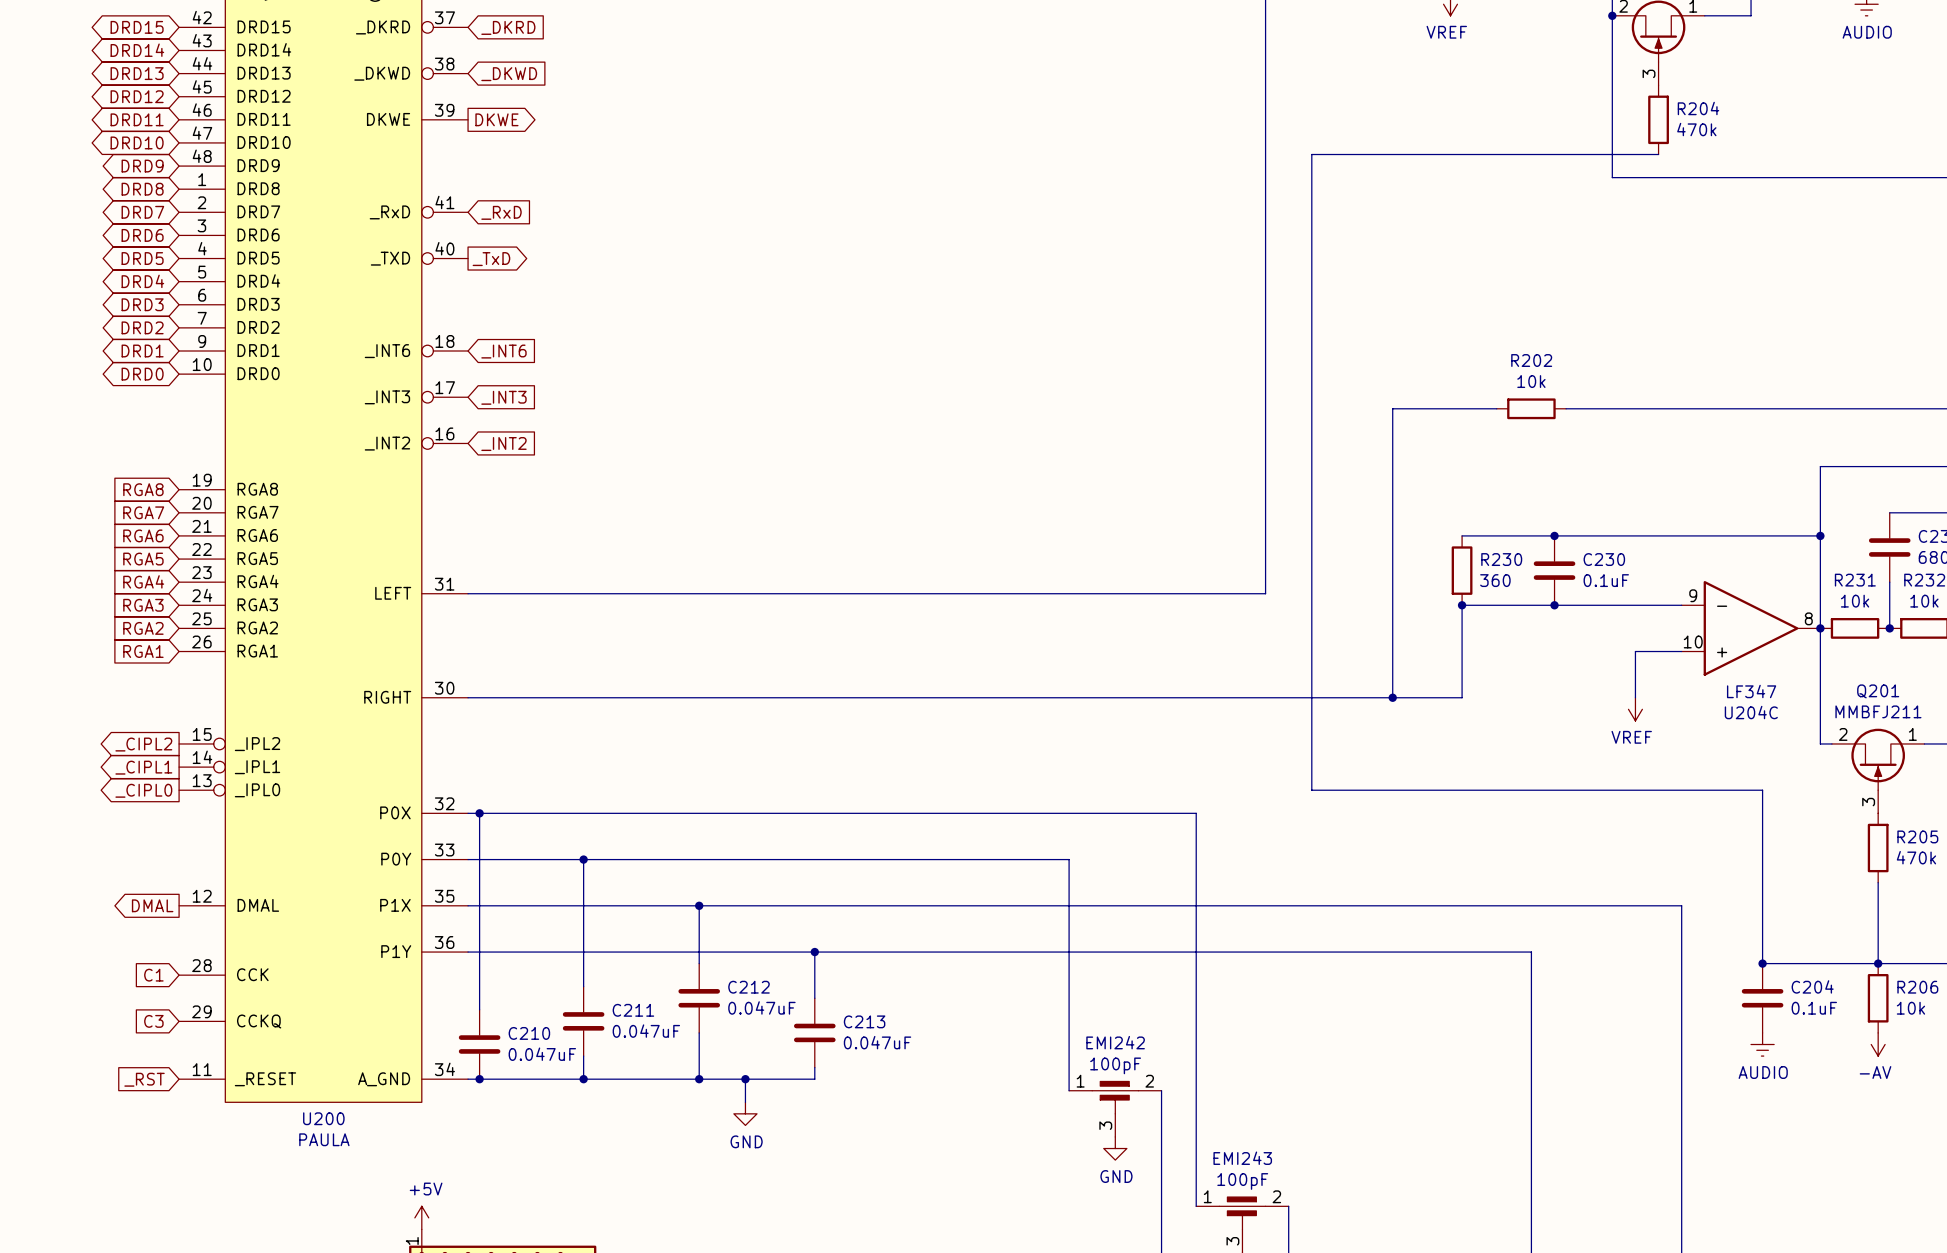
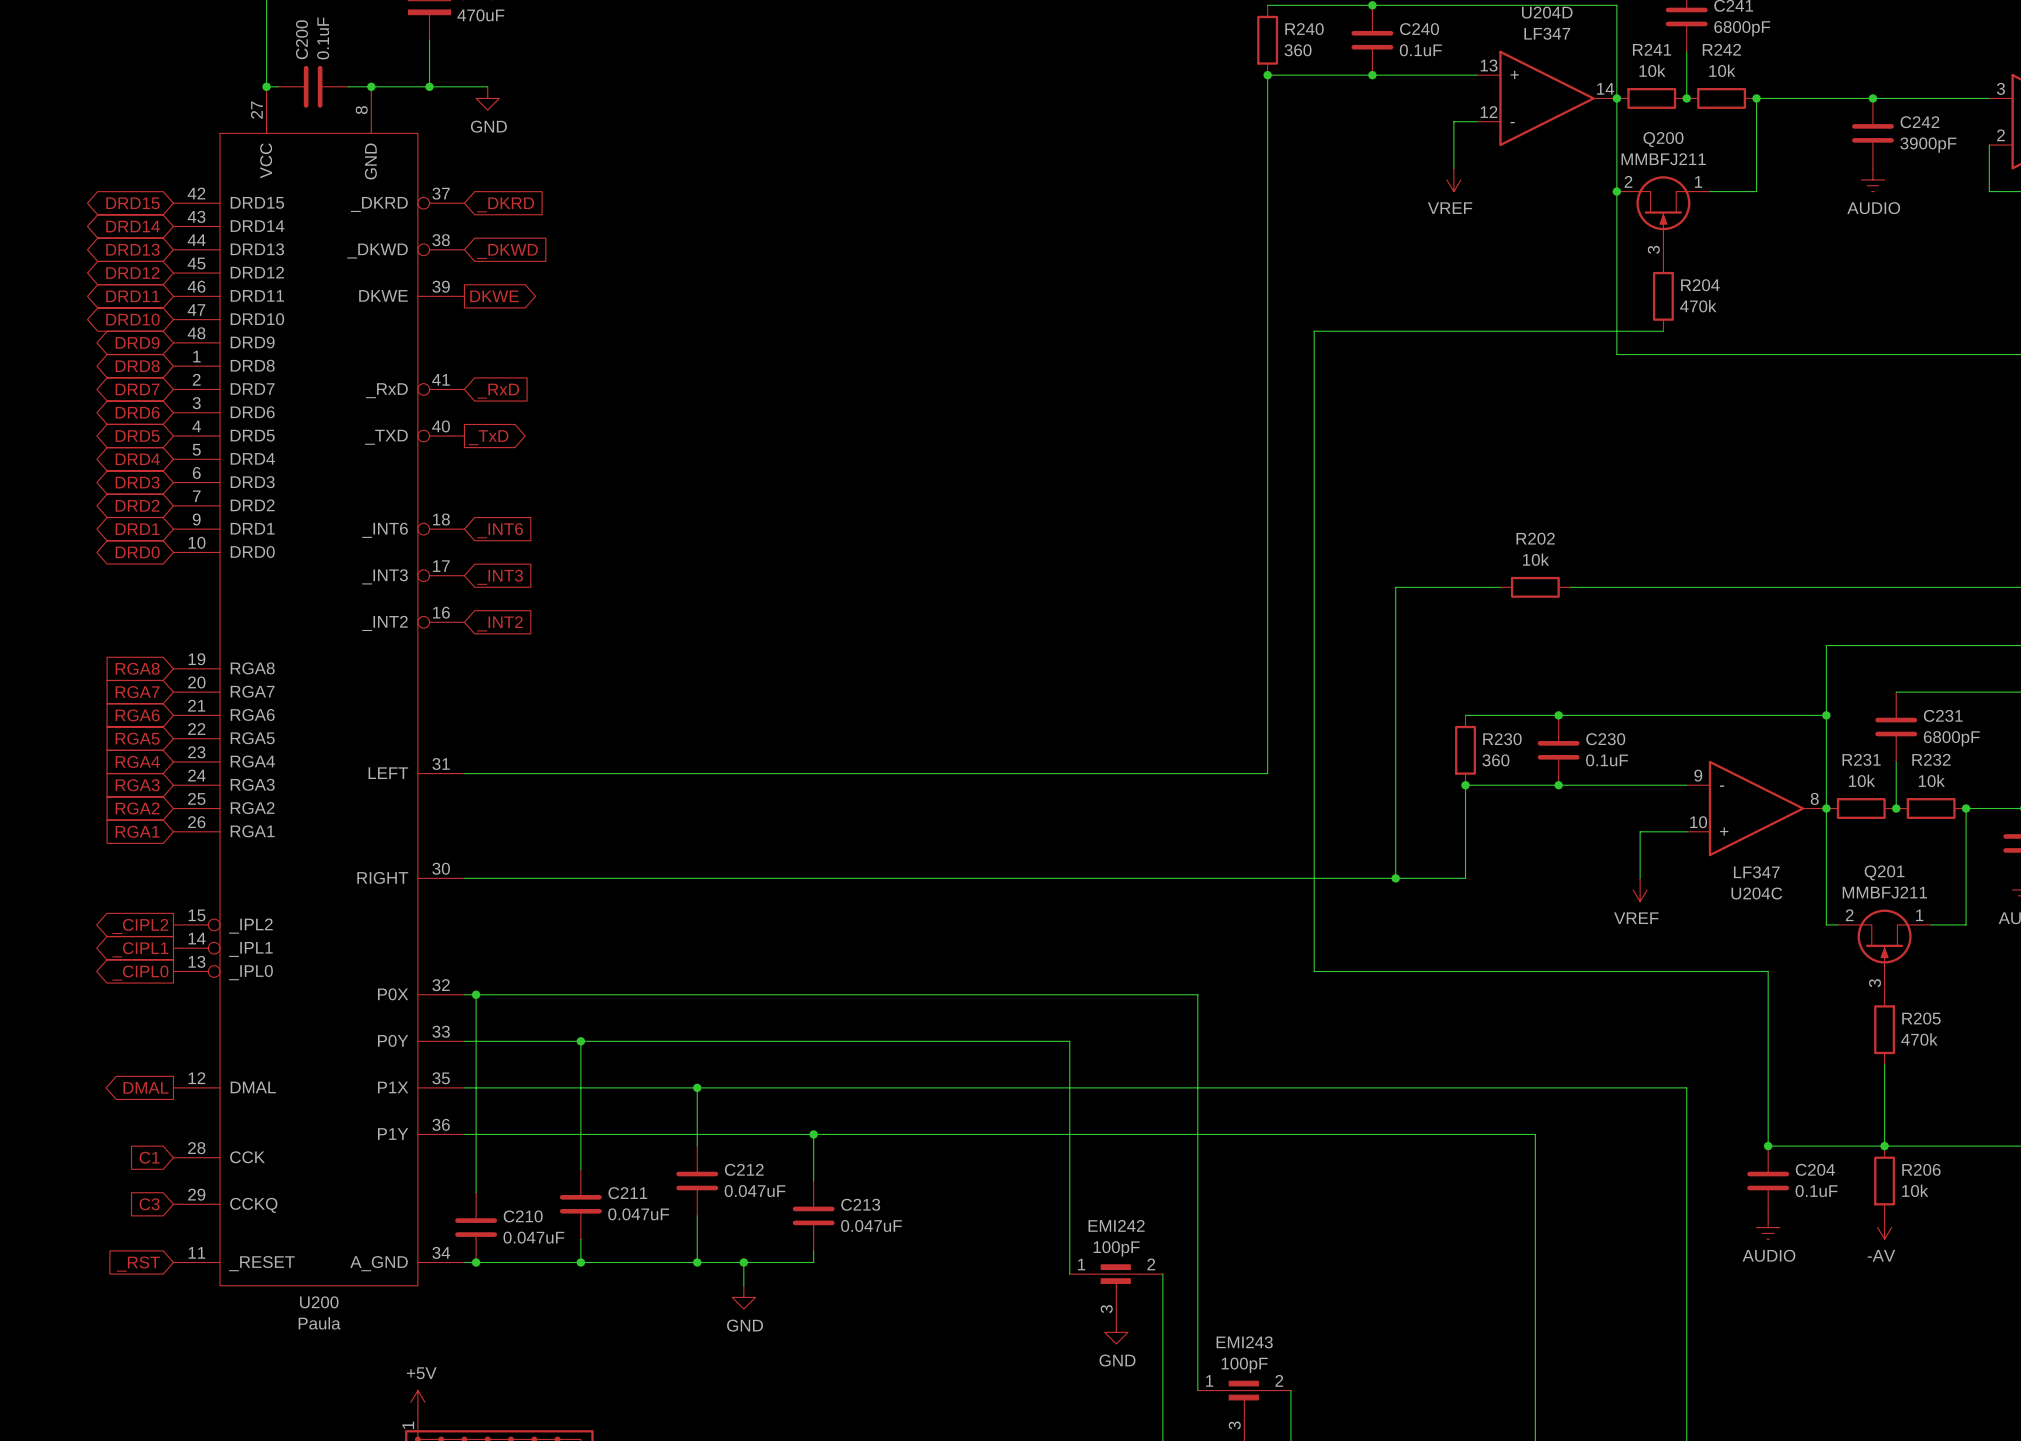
U200 value: PAULA (324, 1139) -> Paula (319, 1323)

